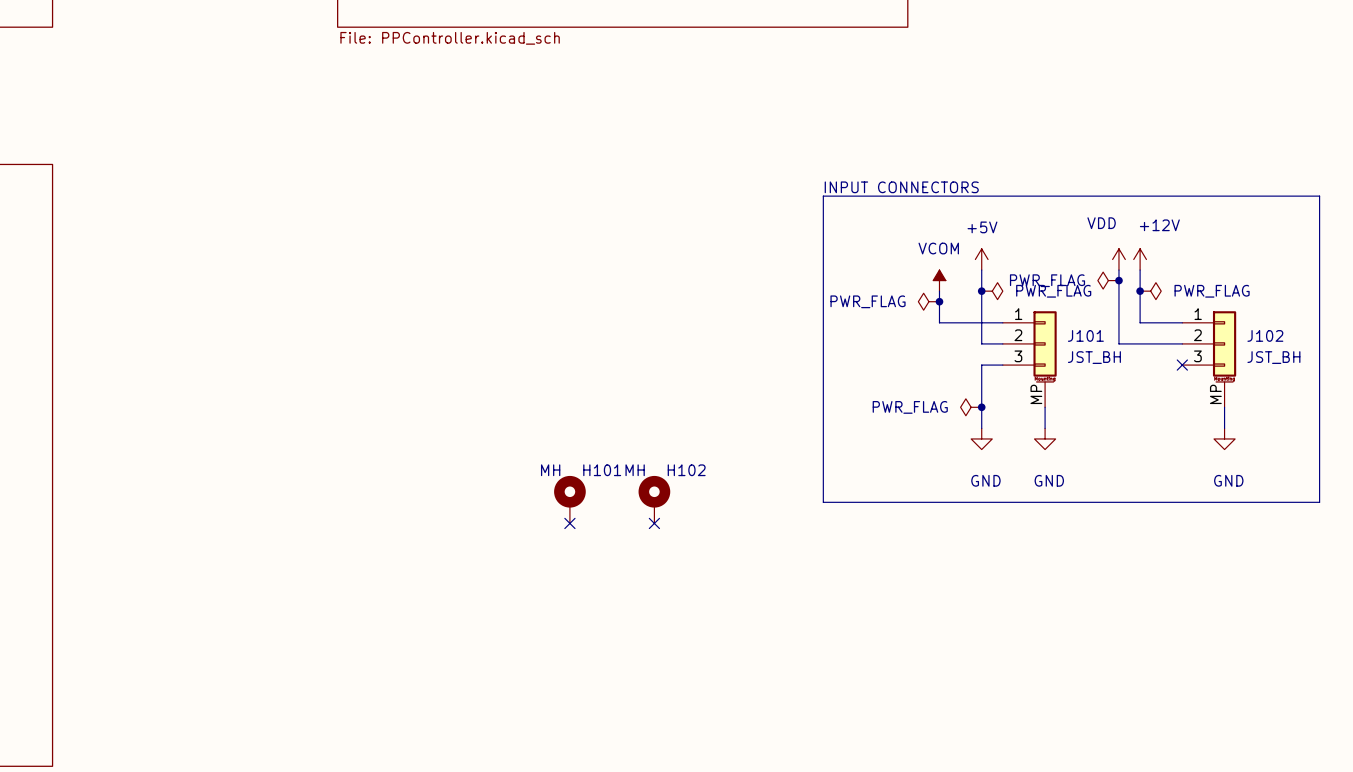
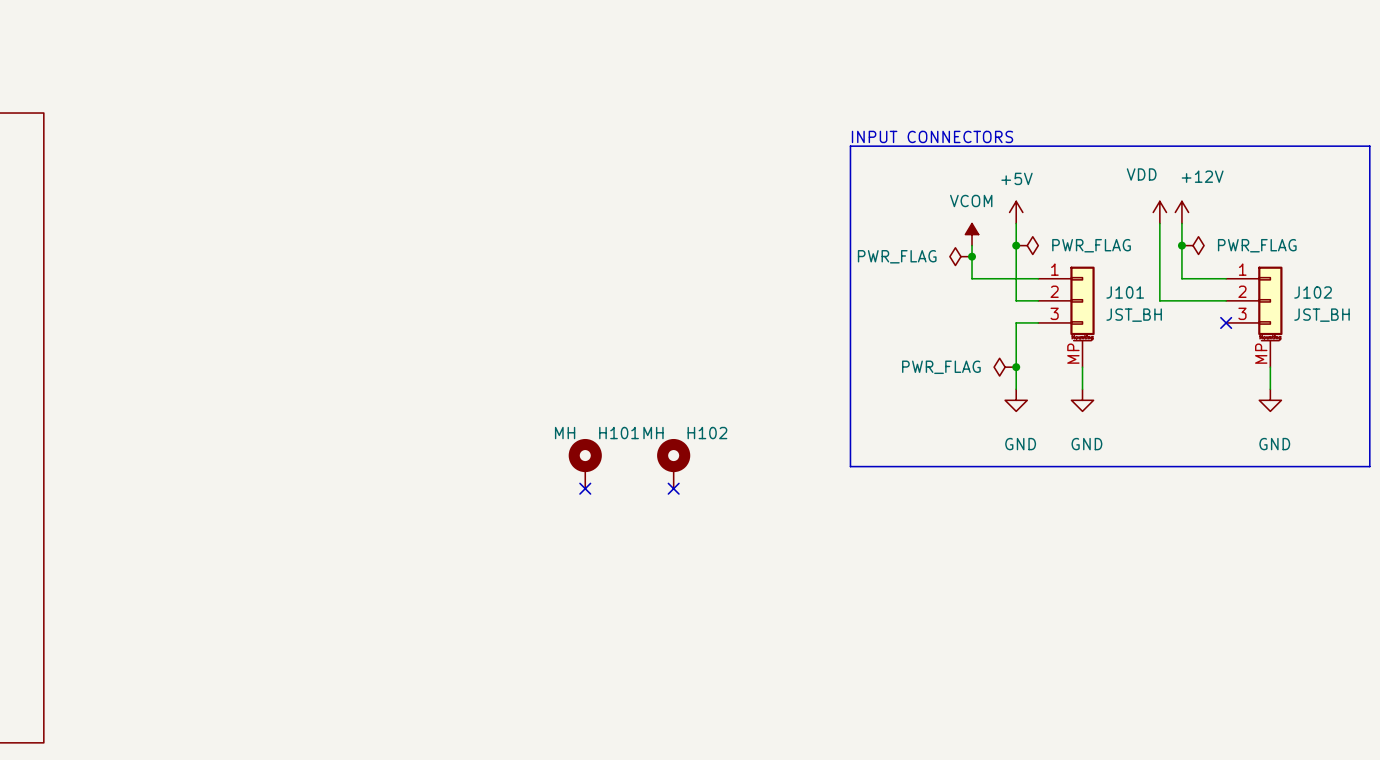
power symbol: PWR_FLAG (1108, 280) -> none
junction: (1118, 280) -> none

